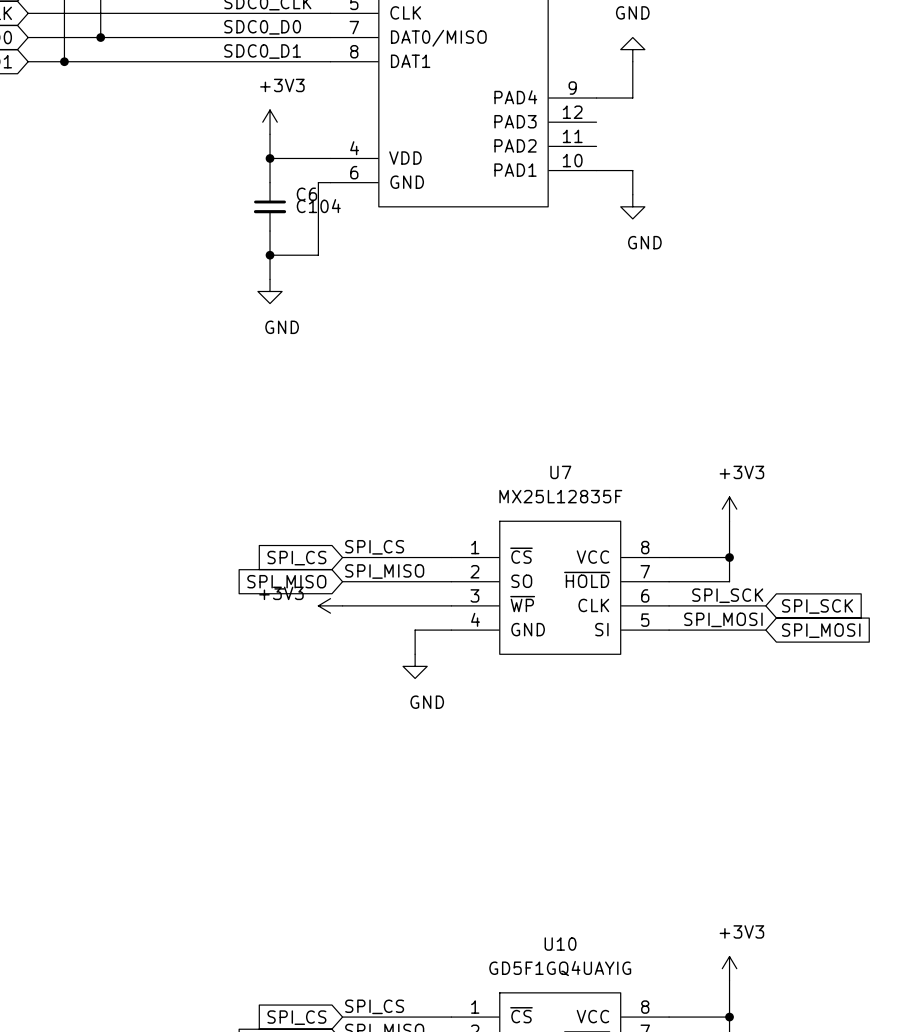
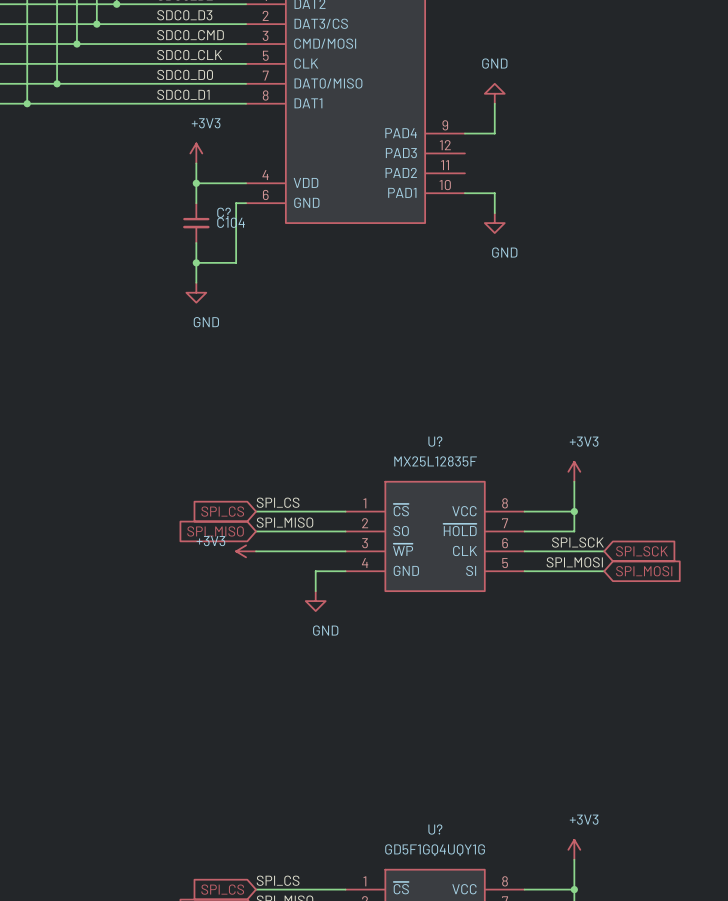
C6 name: C6 (306, 194) -> C? (224, 212)
U7 name: U7 (560, 472) -> U? (435, 441)
U10 name: U10 (560, 944) -> U? (435, 829)
U10 value: GD5F1GQ4UAYIG (560, 968) -> GD5F1GQ4UQY1G (435, 850)

